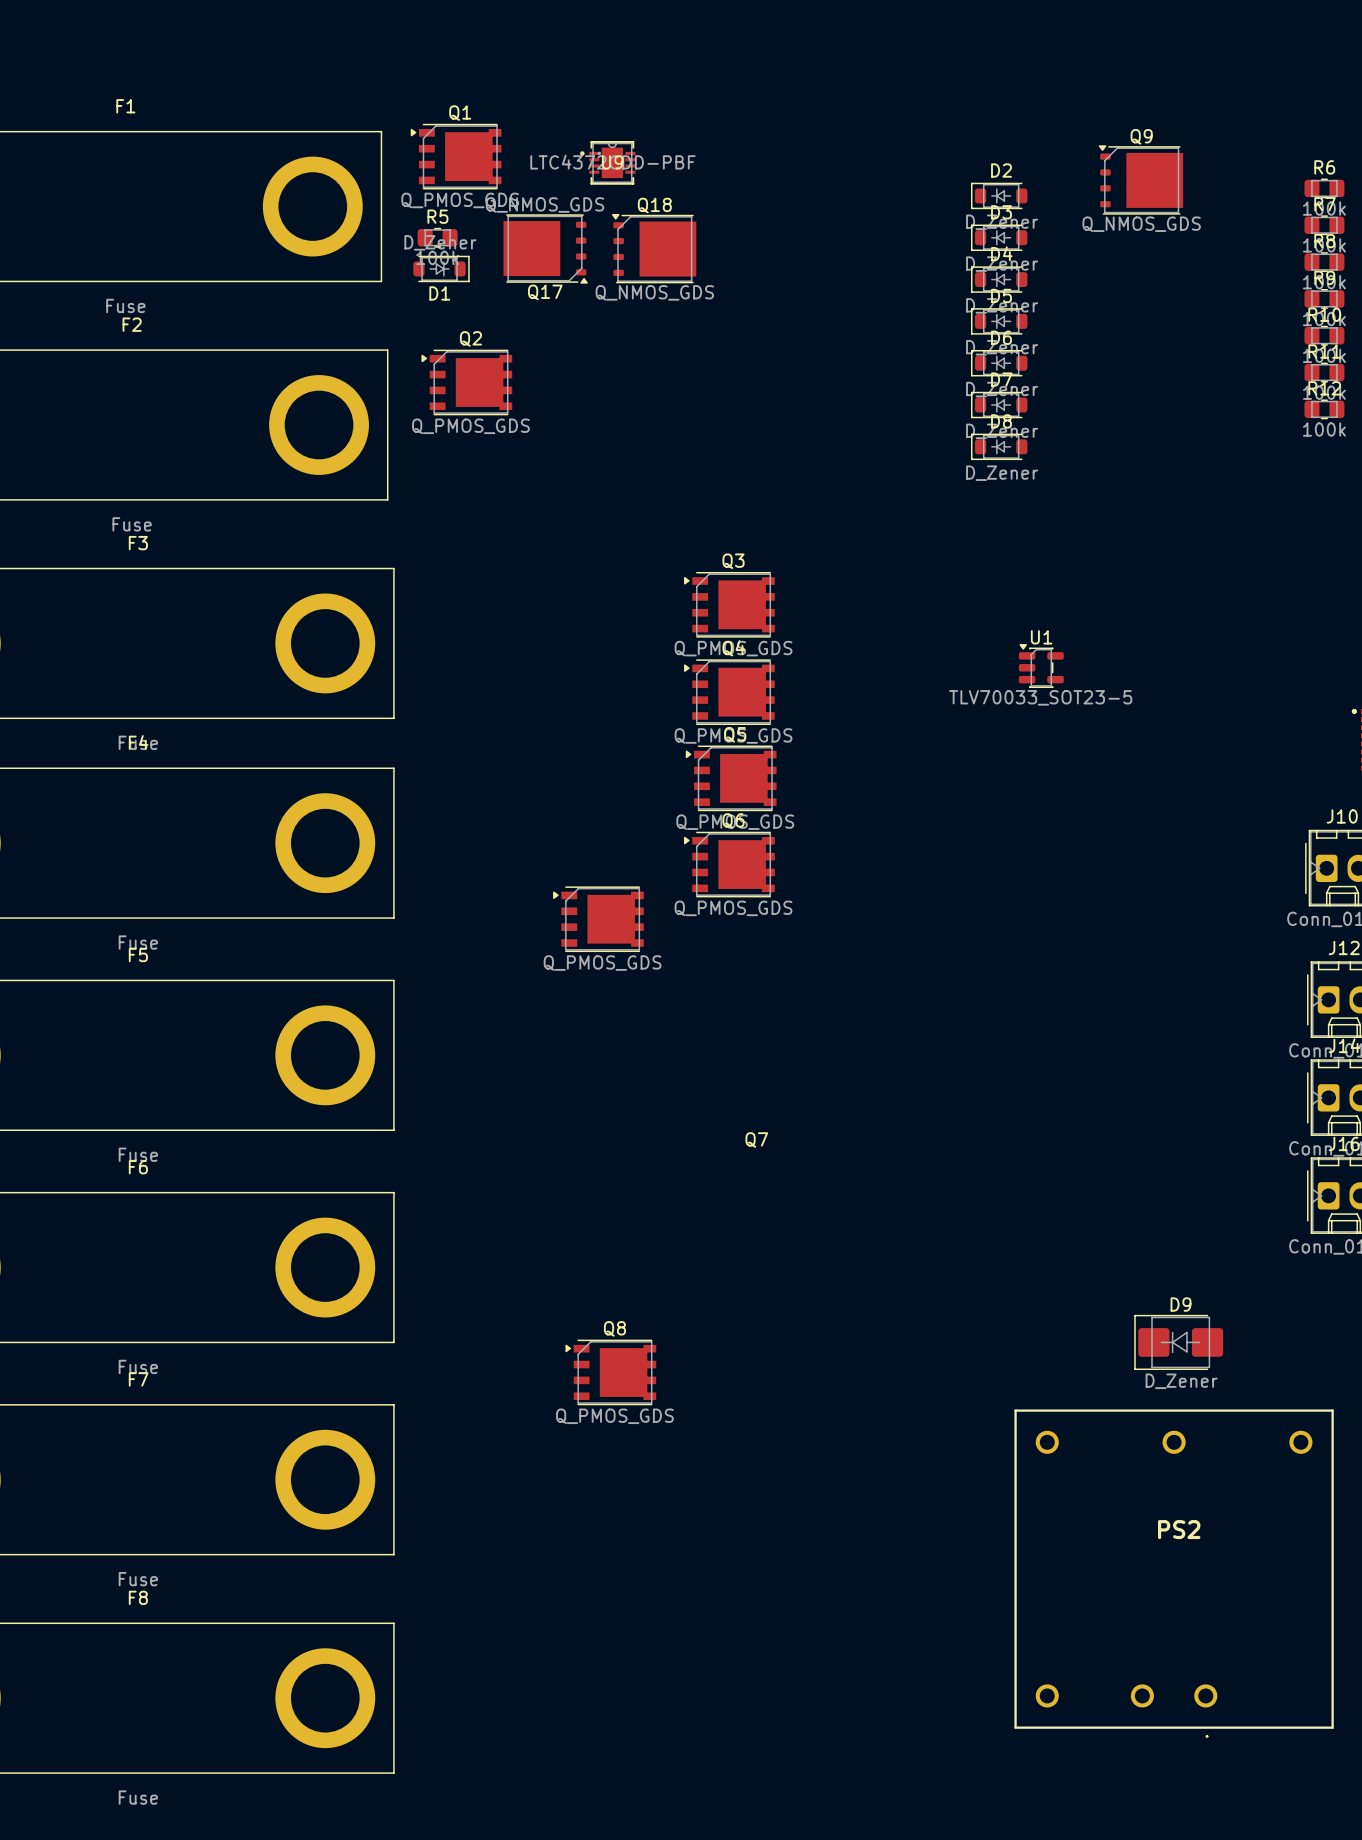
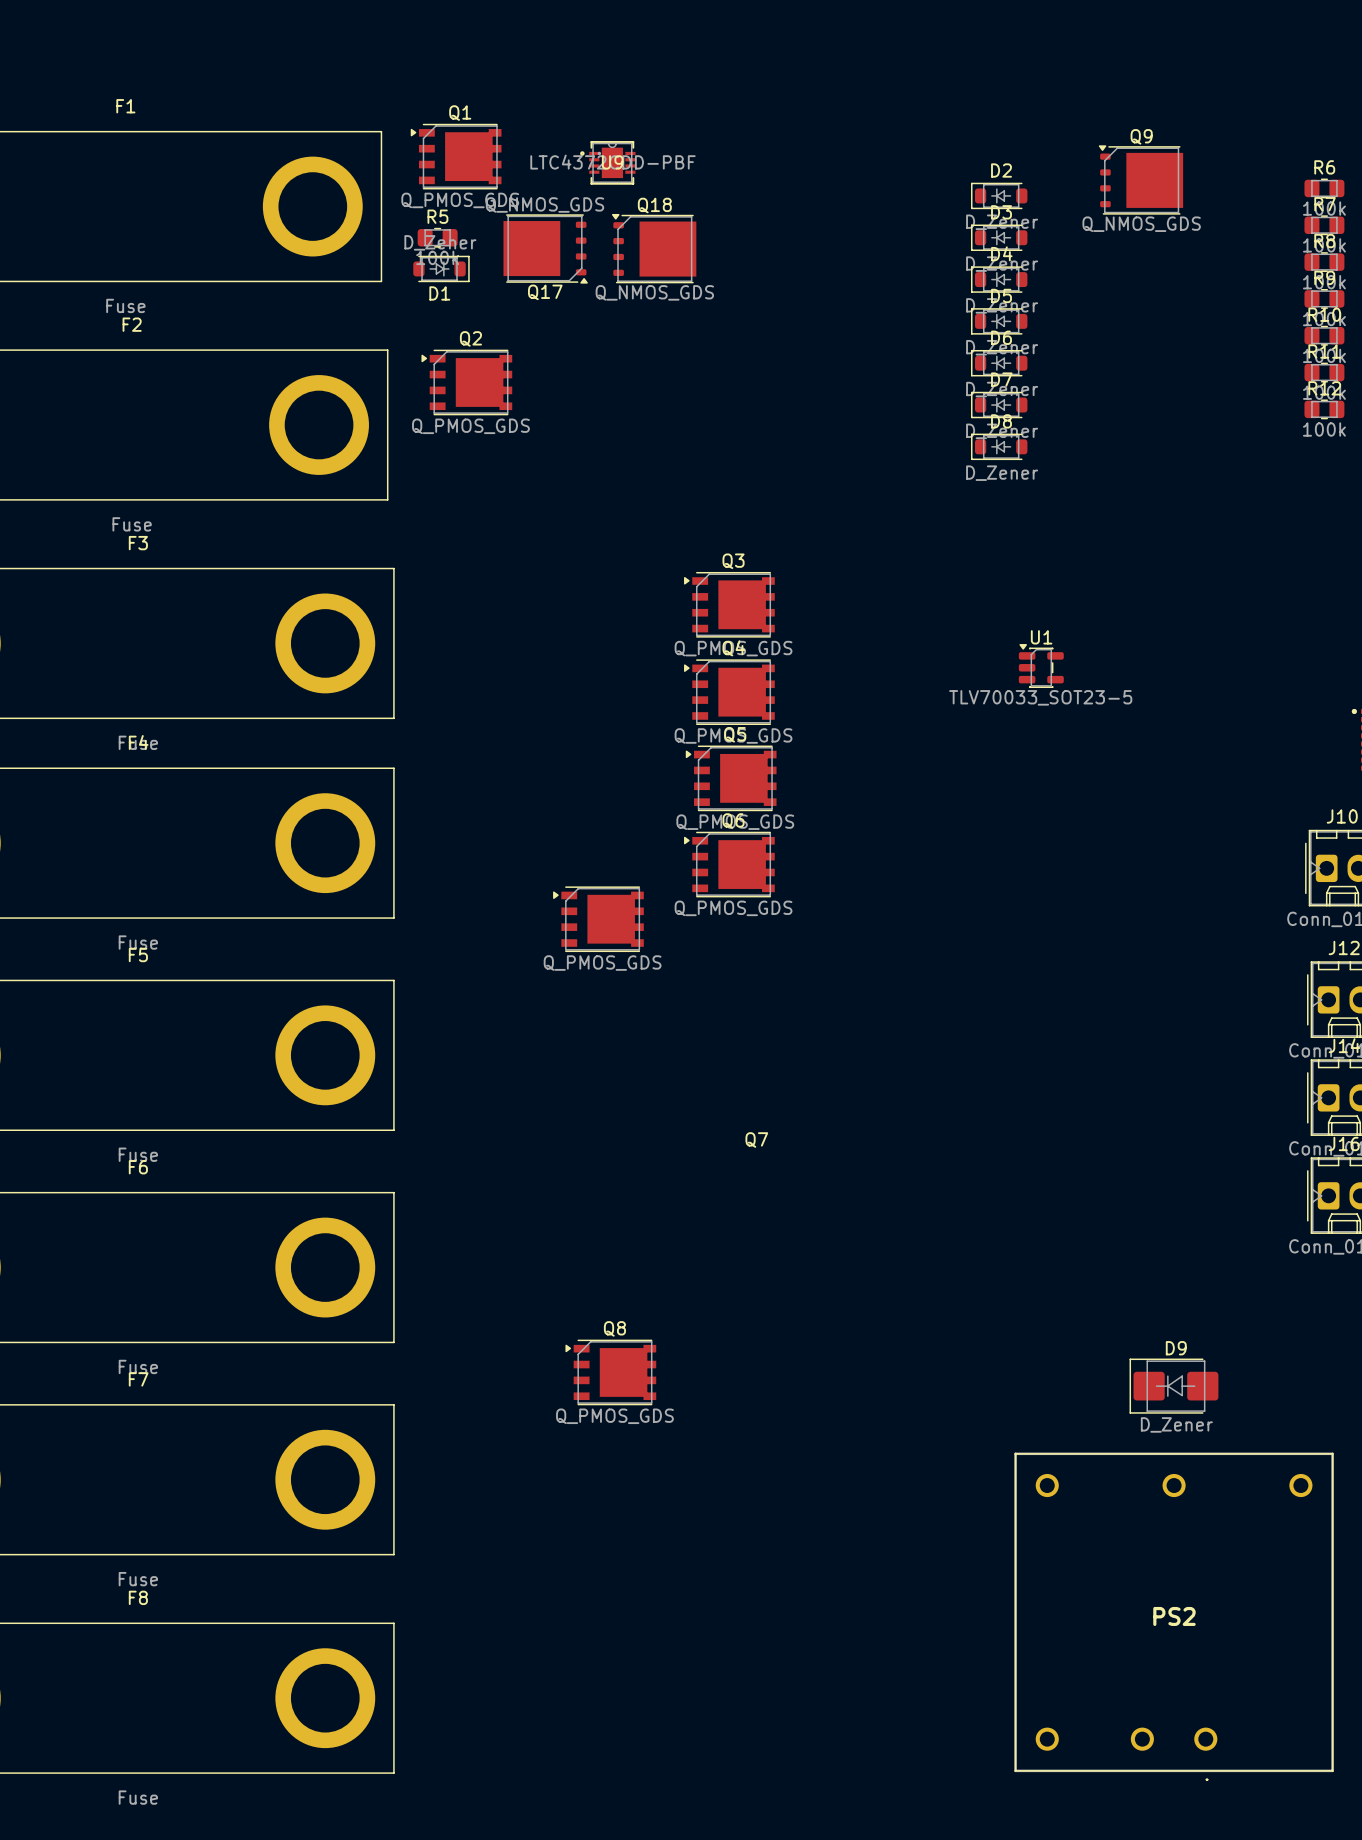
D9 position: (1178, 1342) -> (1173, 1386)
PS2 name position: PS2 (1179, 1529) -> PS2 (1174, 1616)
PS2 position: (1174, 1573) -> (1174, 1616)

